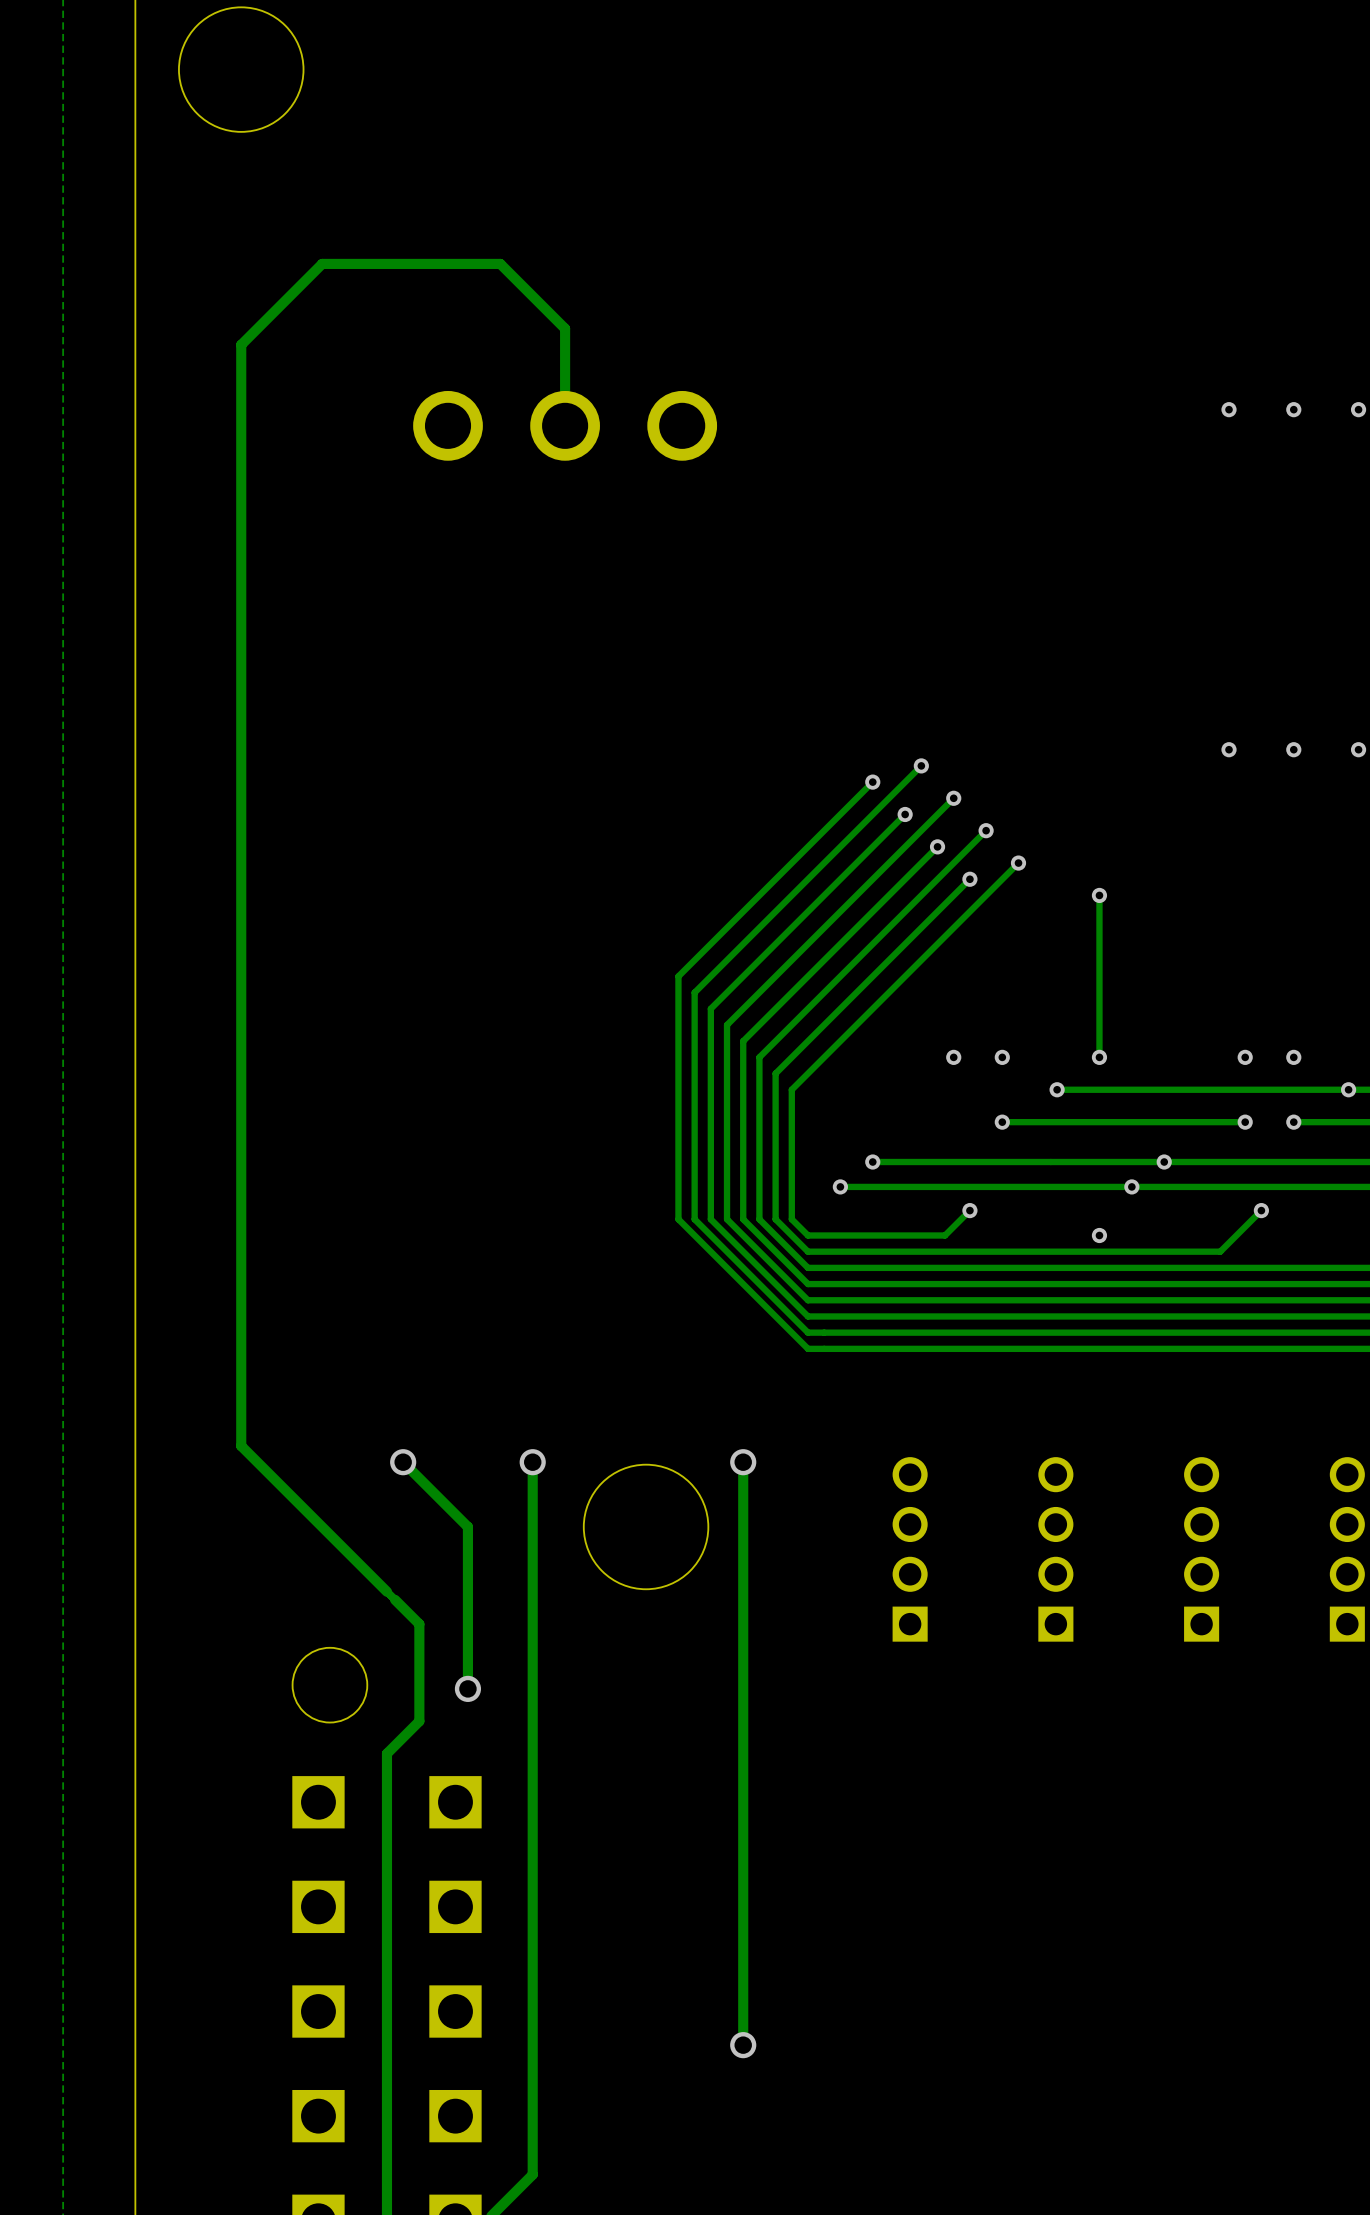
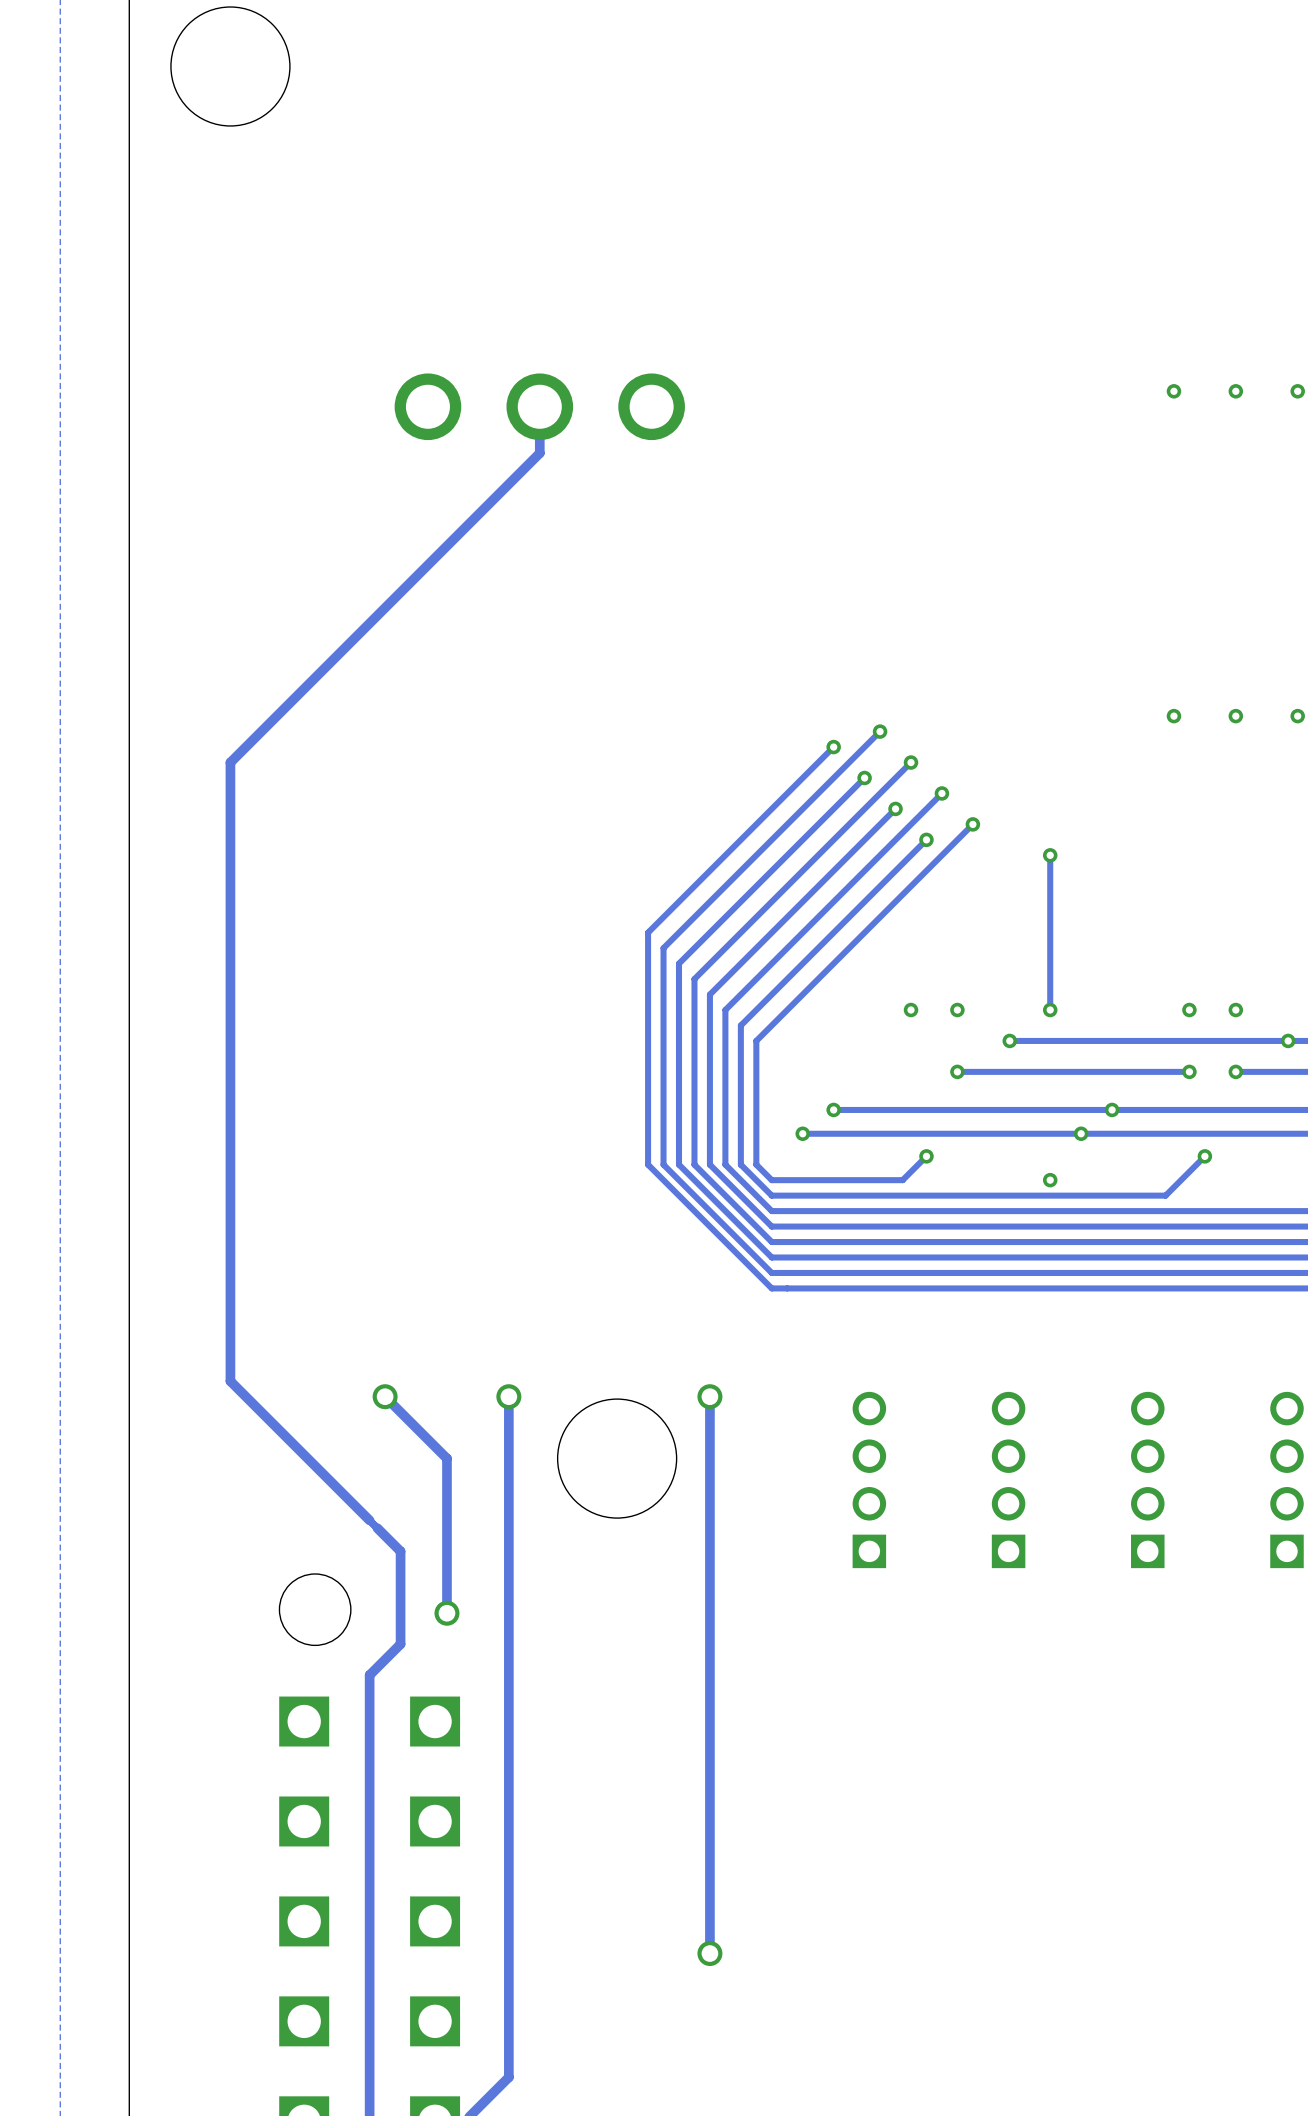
track: (565, 425) (565, 328) (500, 263) (322, 263) (241, 344) (241, 798) -> (539, 406) (539, 453) (230, 762)

